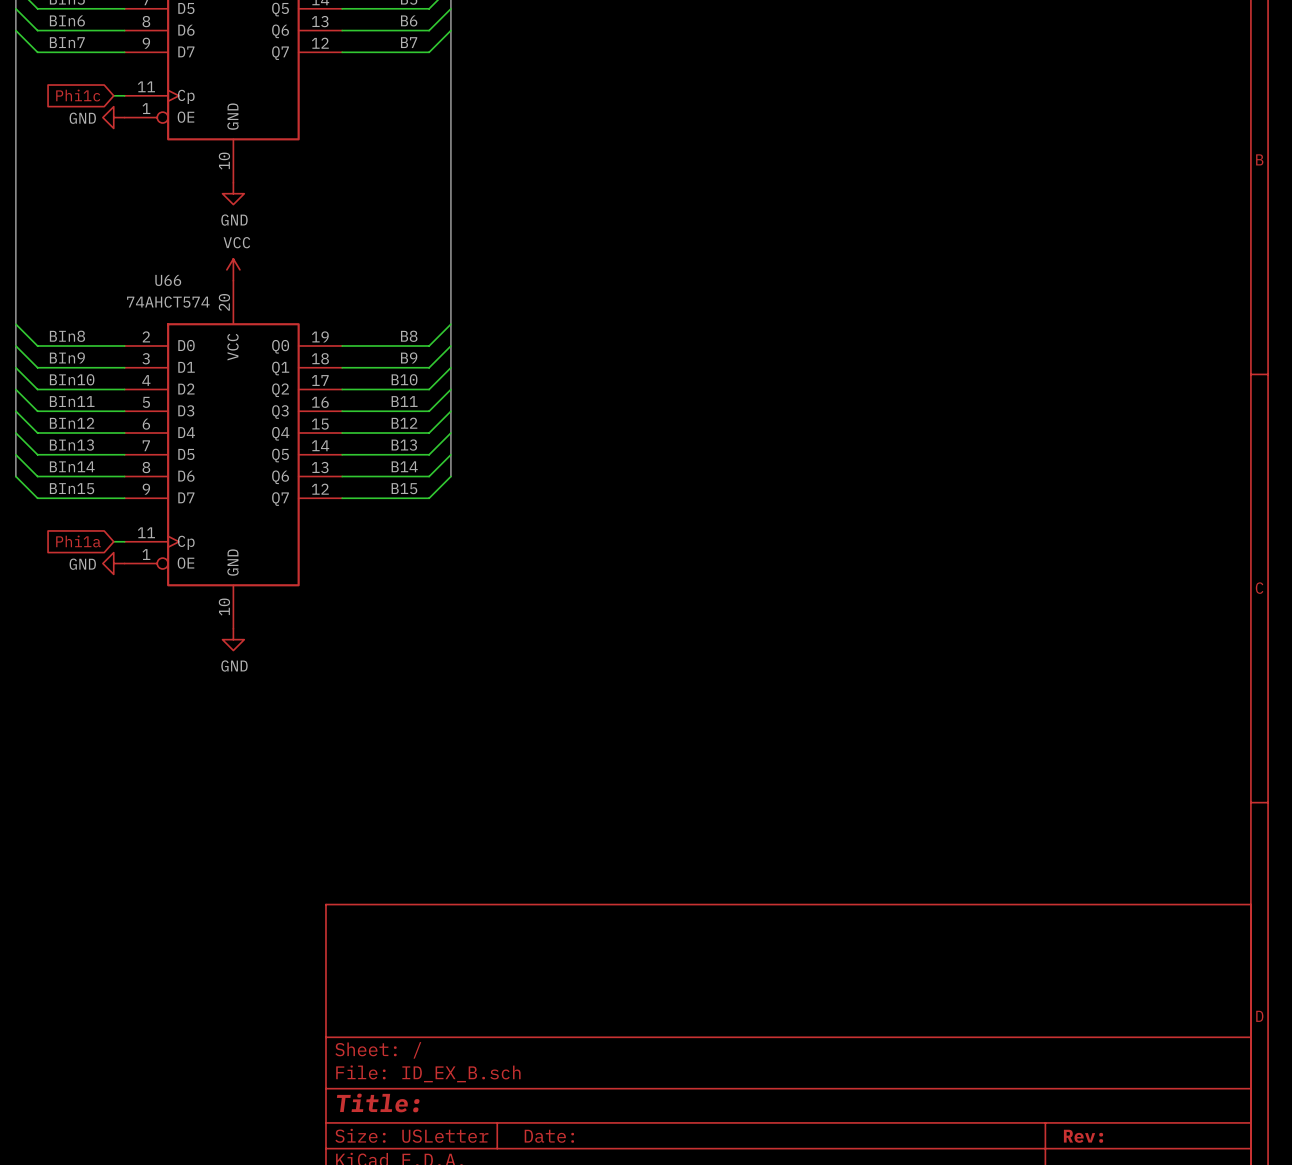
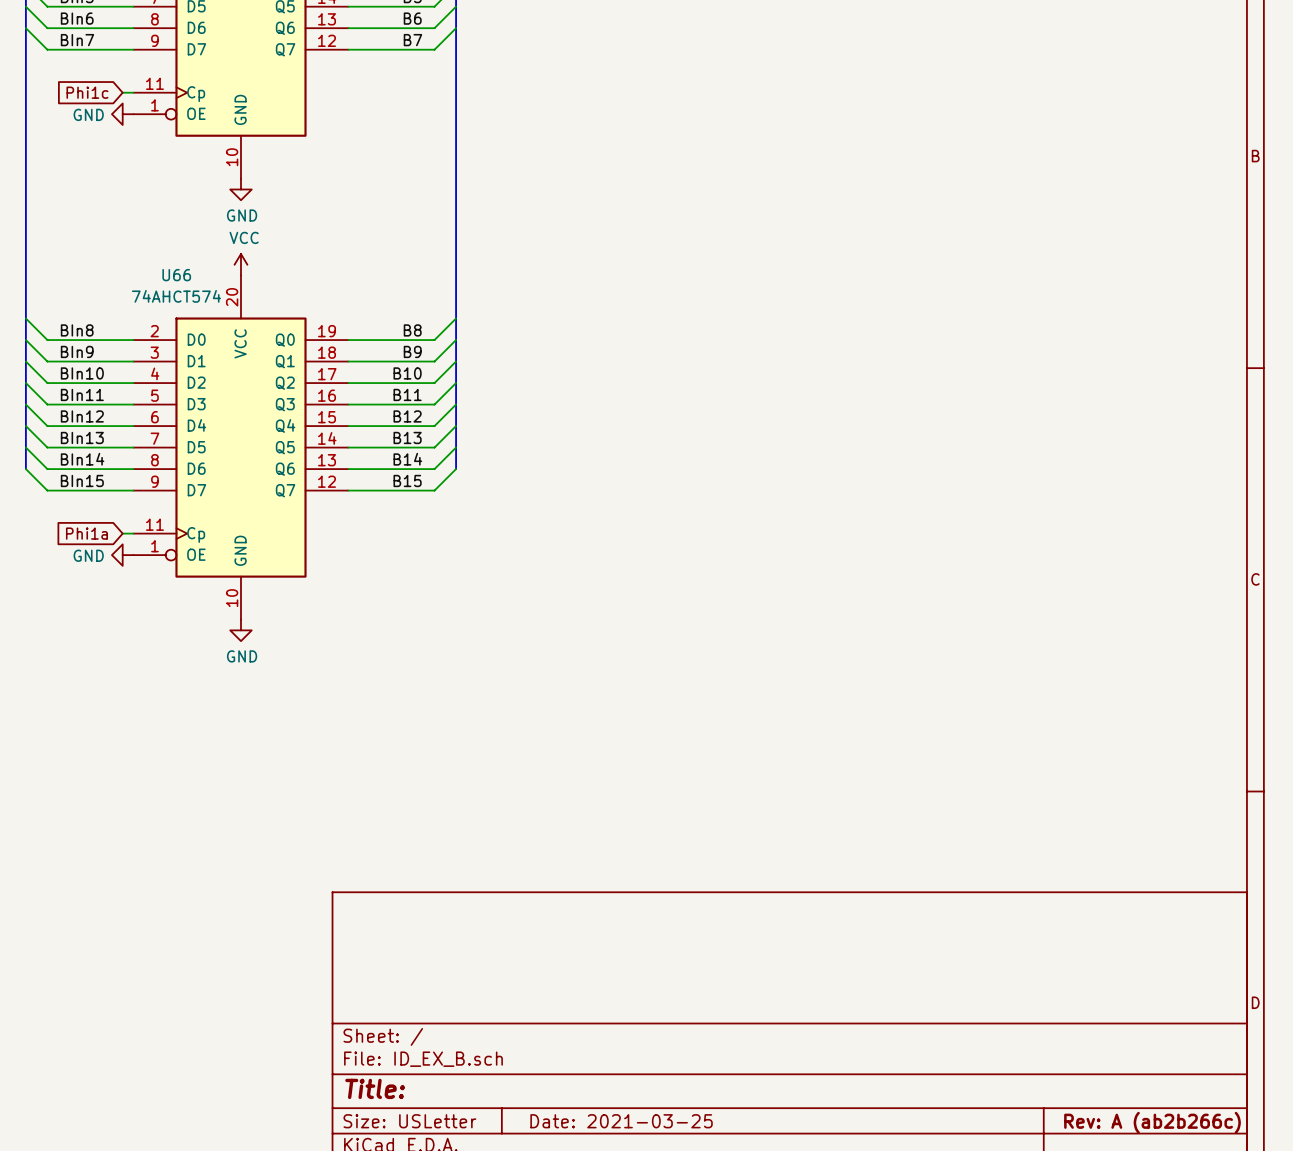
title block: Date: (549, 1136) -> Date: 2021-03-25 (621, 1121)
title block: Rev: (1083, 1136) -> Rev: A (ab2b266c) (1152, 1122)

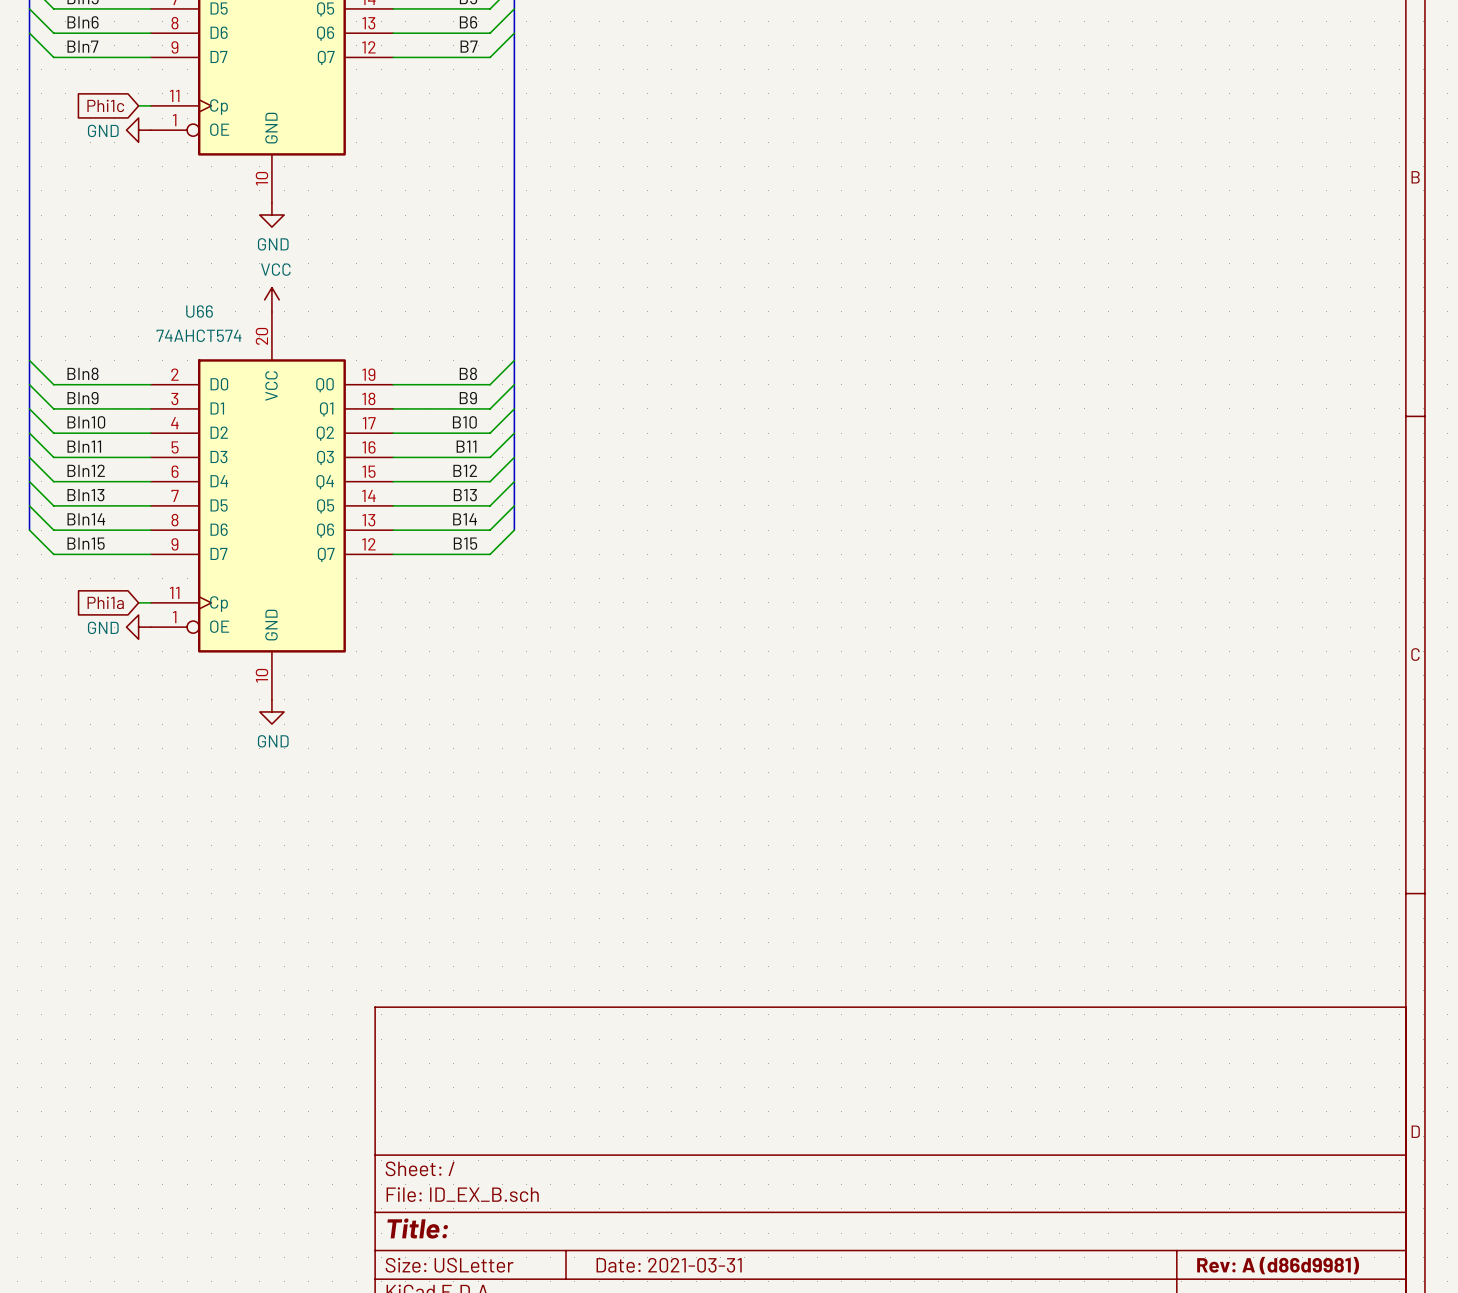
title block: Date: 2021-03-25 (621, 1121) -> Date: 2021-03-31 (669, 1265)
title block: Rev: A (ab2b266c) (1152, 1122) -> Rev: A (d86d9981) (1278, 1265)

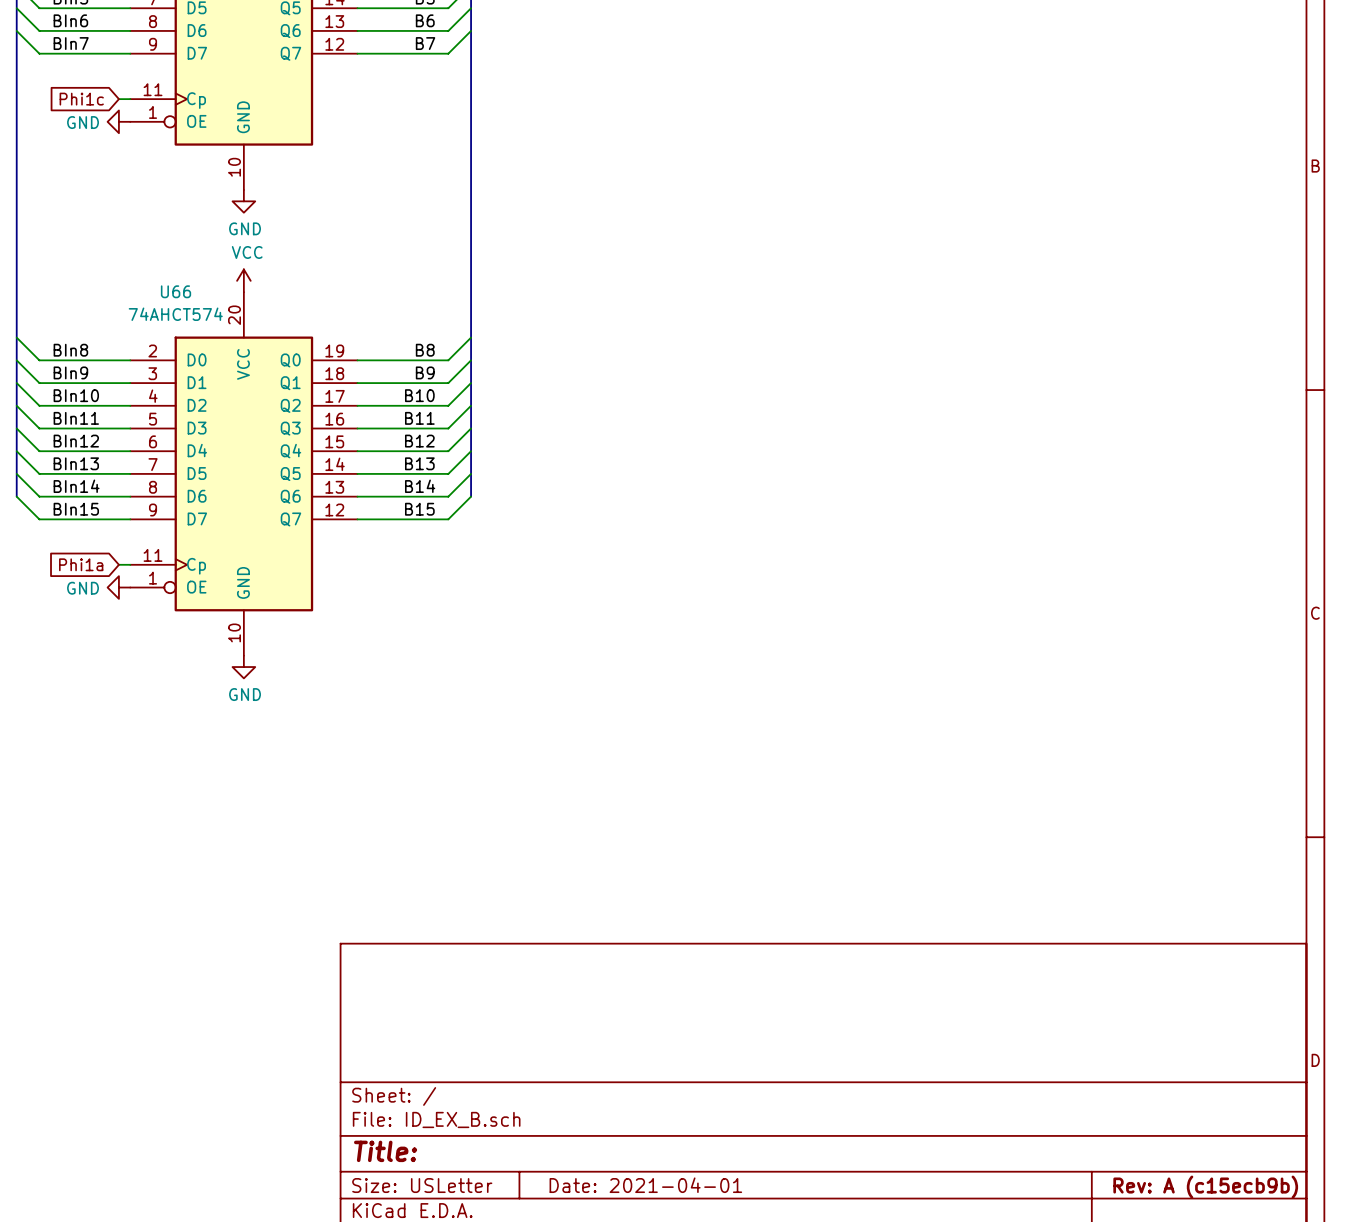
title block: Date: 2021-03-31 (669, 1265) -> Date: 2021-04-01 (645, 1185)
title block: Rev: A (d86d9981) (1278, 1265) -> Rev: A (c15ecb9b) (1205, 1187)

